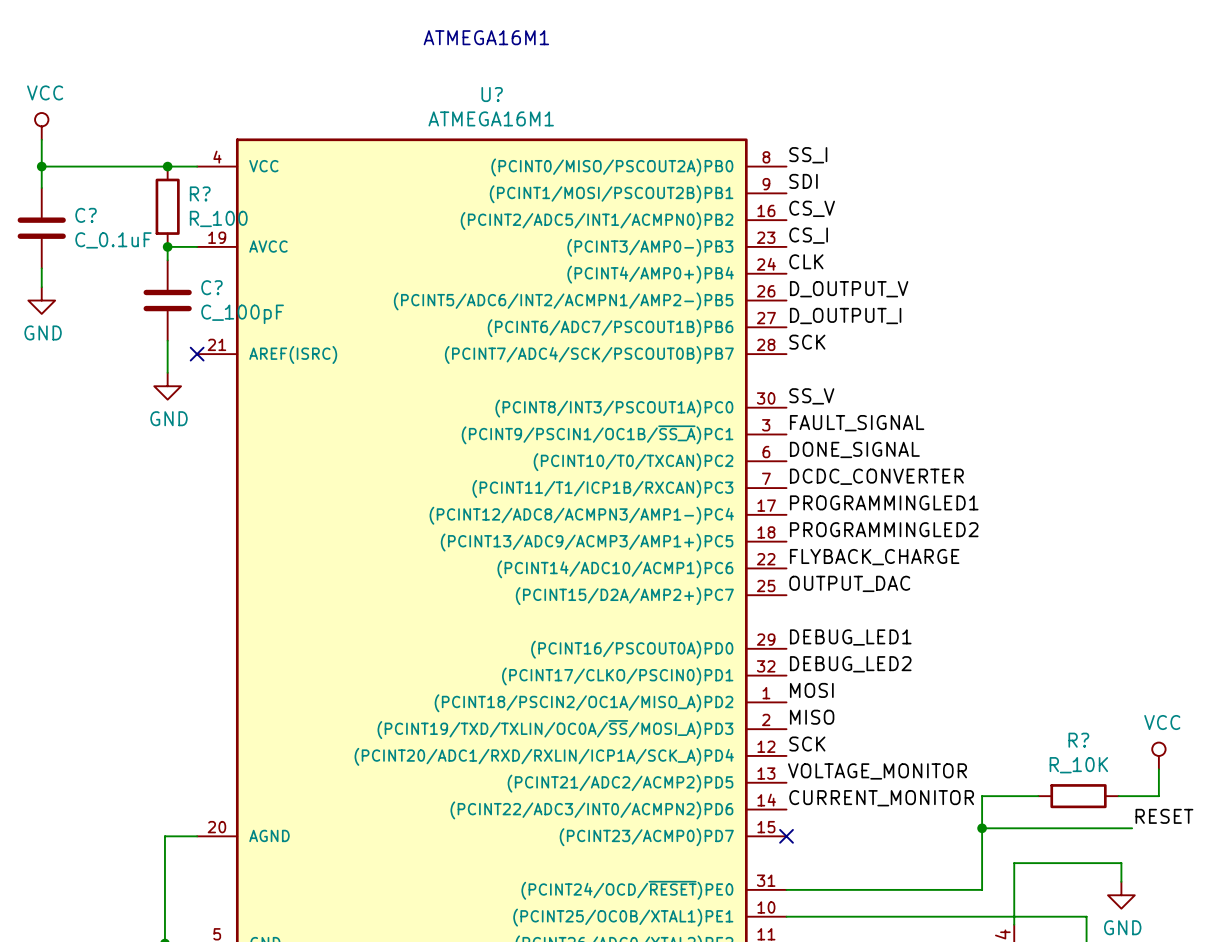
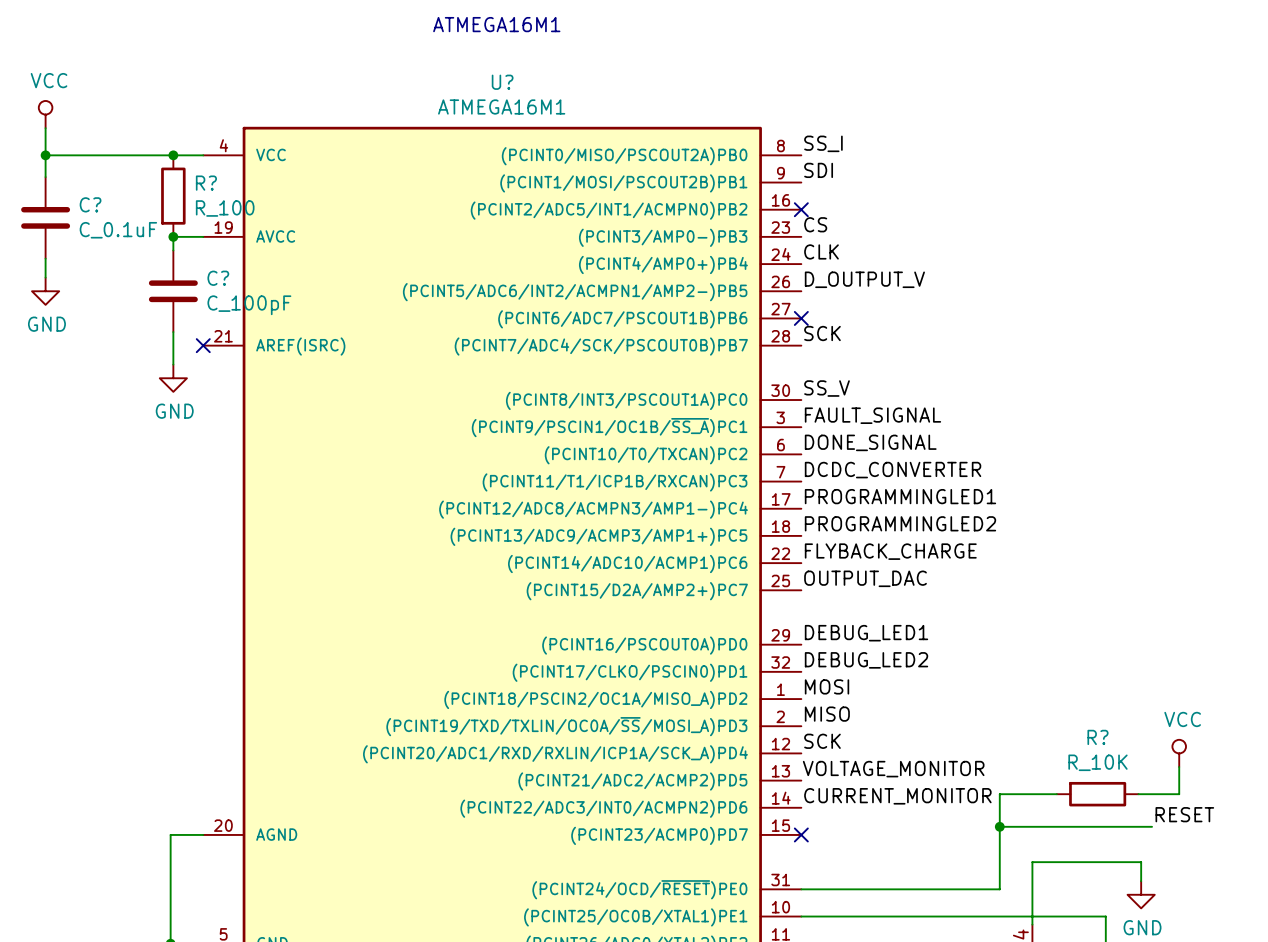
label: CS_V (812, 208) -> none
no-connect mark: none -> (801, 209)
label: CS_I (808, 235) -> CS (815, 224)
label: D_OUTPUT_I (845, 316) -> none
no-connect mark: none -> (801, 318)

